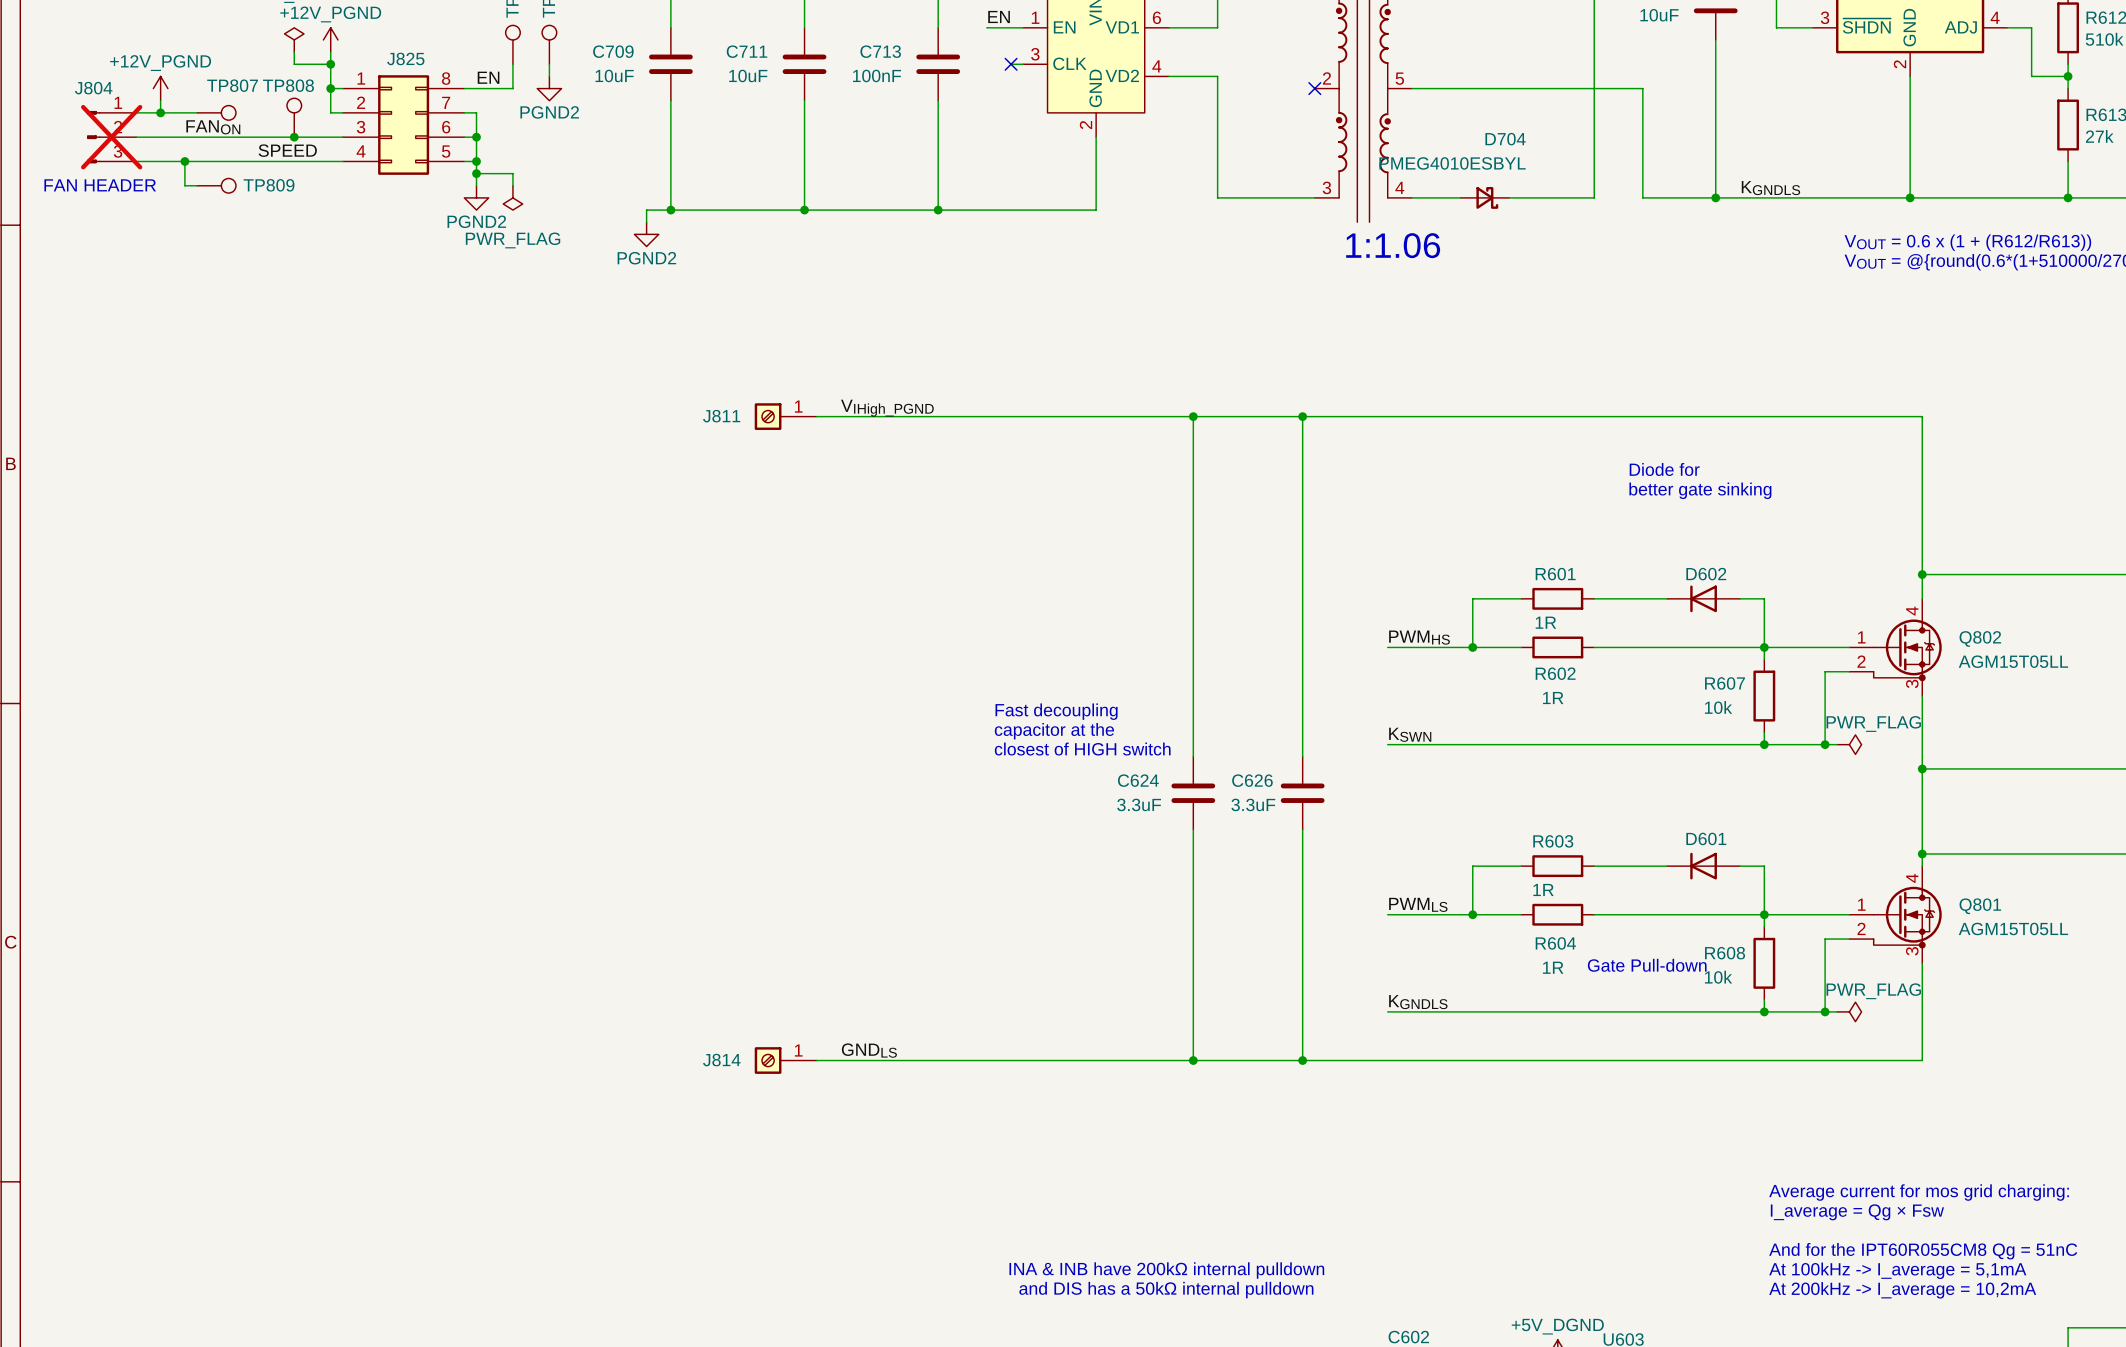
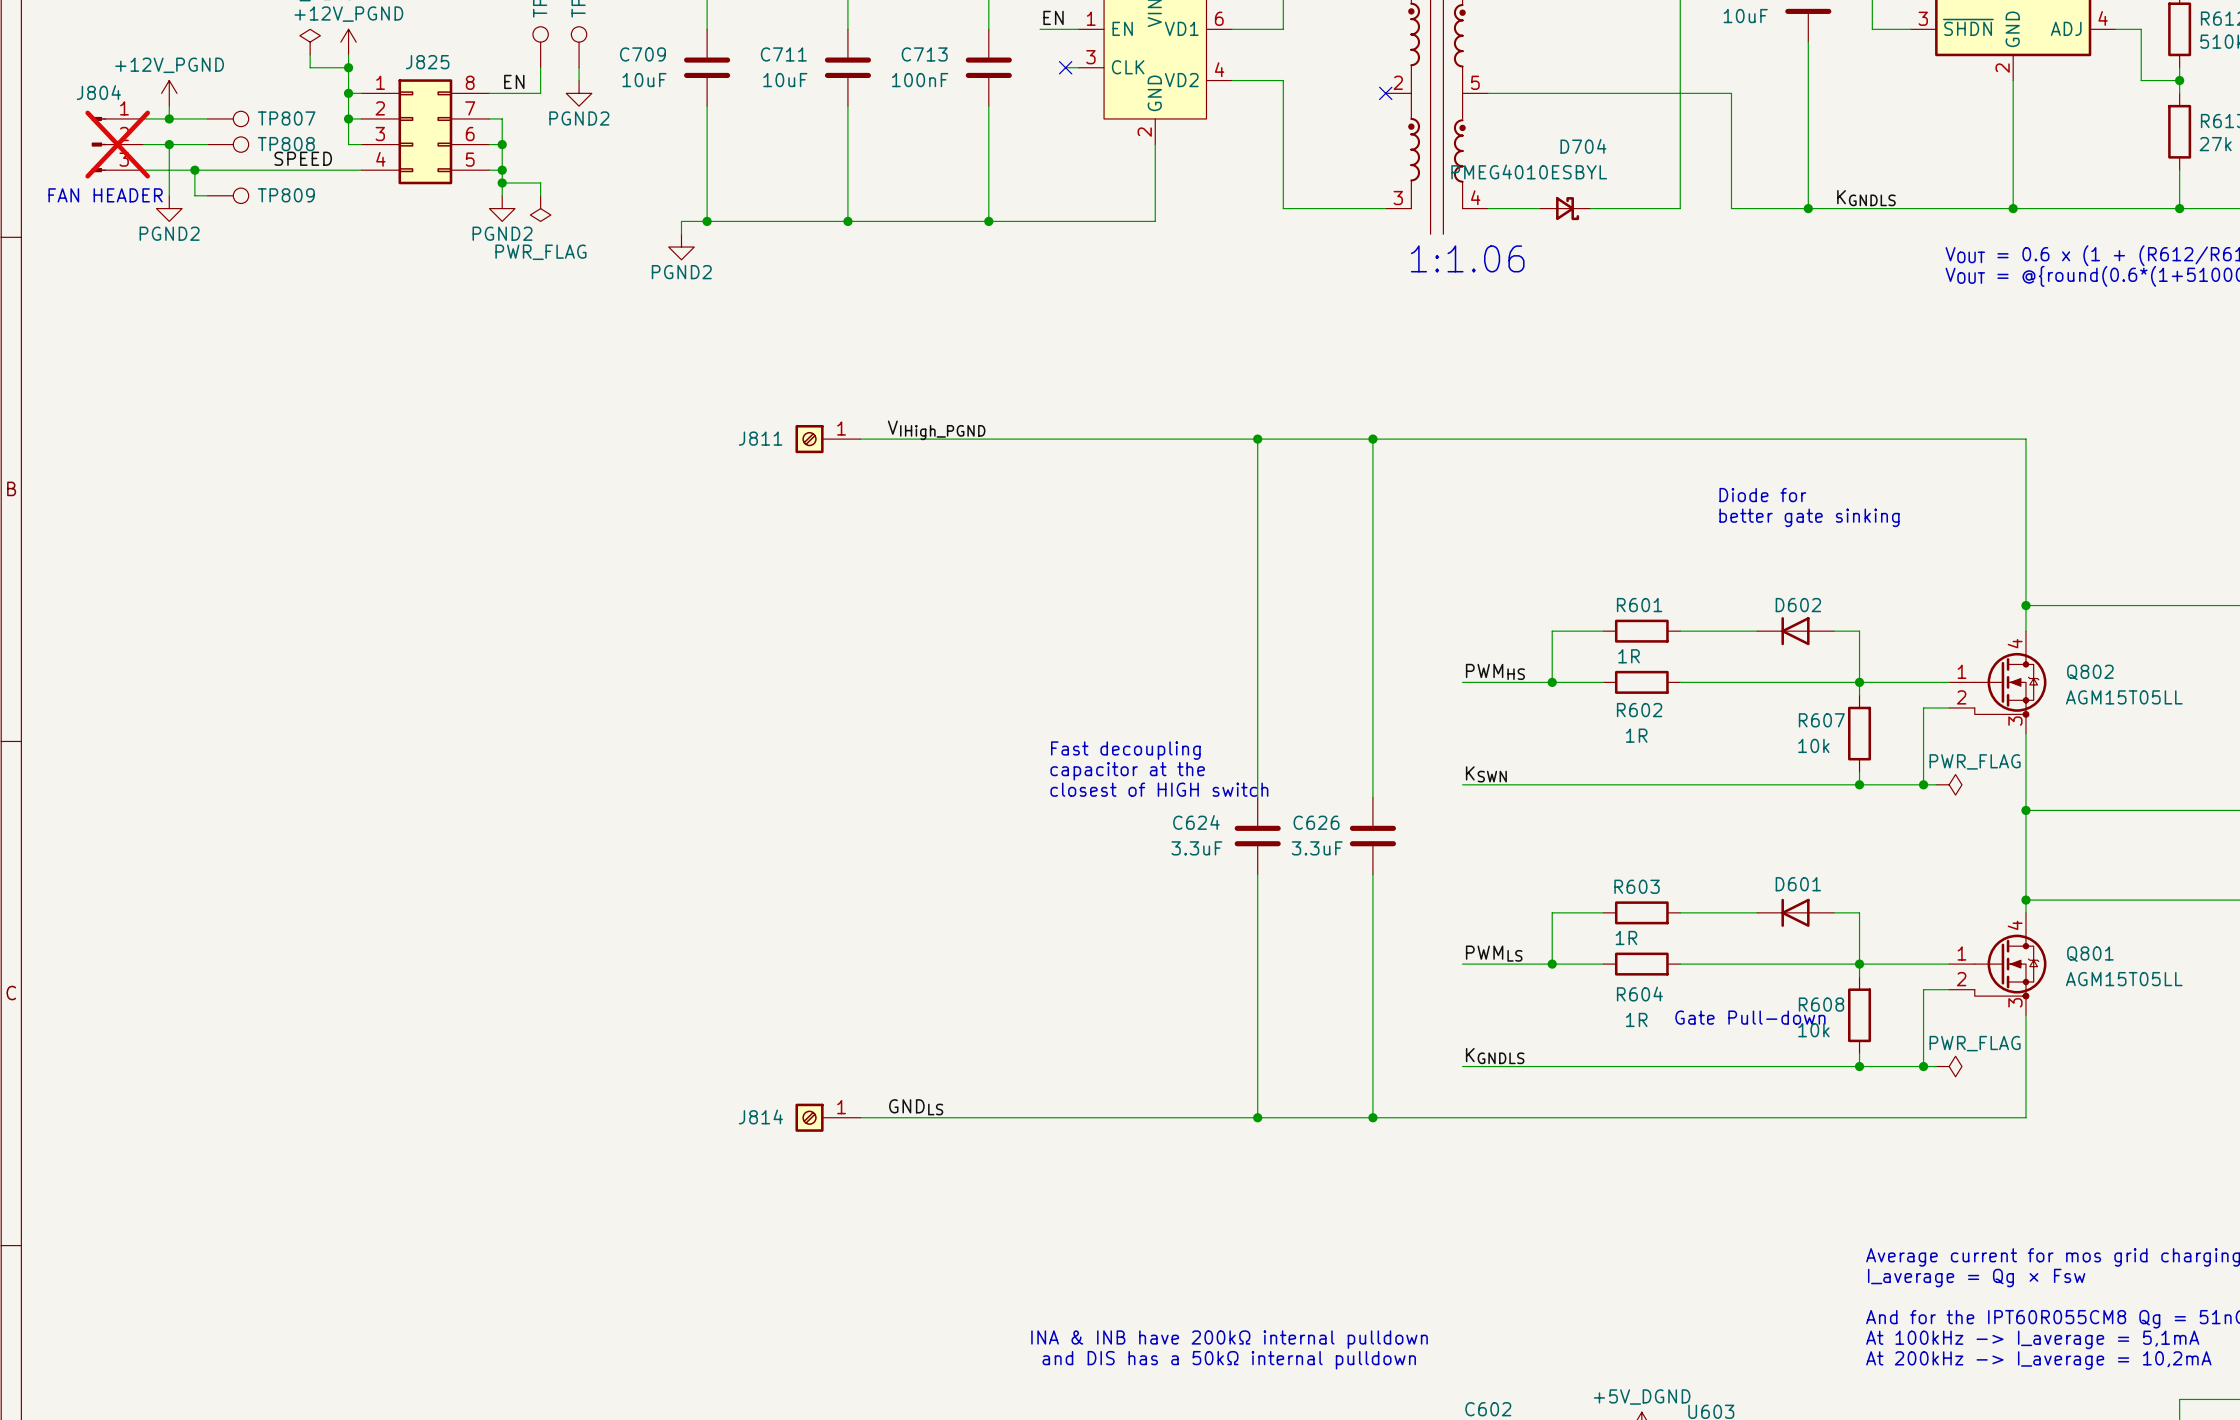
TP807 name position: TP807 (232, 85) -> TP807 (286, 118)
TP808 name position: TP808 (288, 85) -> TP808 (286, 144)
TP808 rotation: 0° (294, 105) -> 90° clockwise (241, 144)
TP808 position: (294, 117) -> (228, 144)
label: FANON (213, 127) -> none
wire: none -> (169, 144) (169, 195)
junction: none -> (169, 144)
wire: (197, 137) (330, 137) -> (348, 118) (348, 144)
junction position: (294, 137) -> (348, 118)
power symbol: none -> PGND2 (169, 208)

